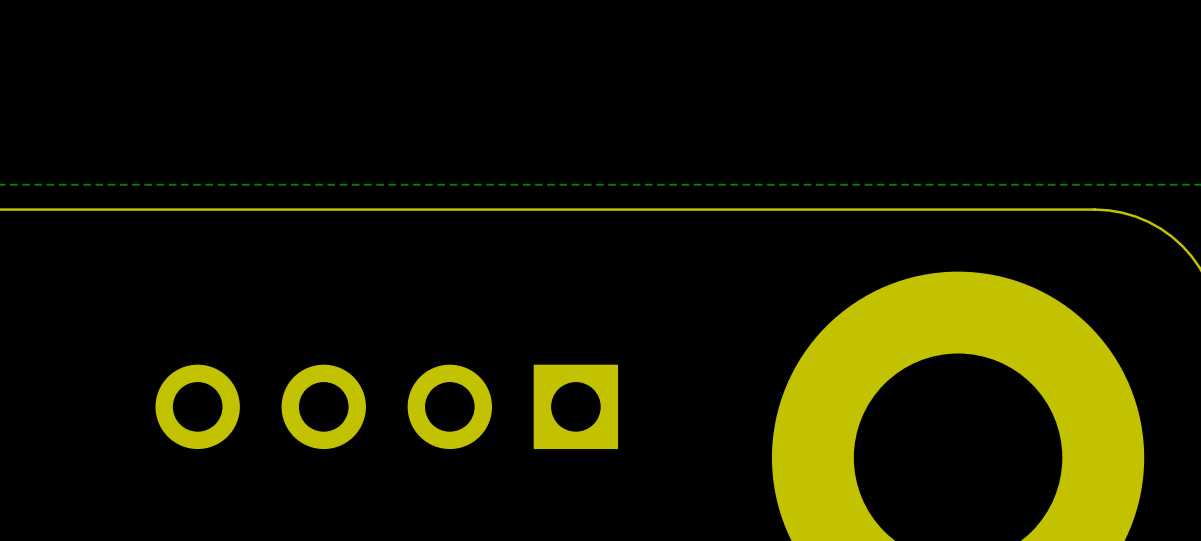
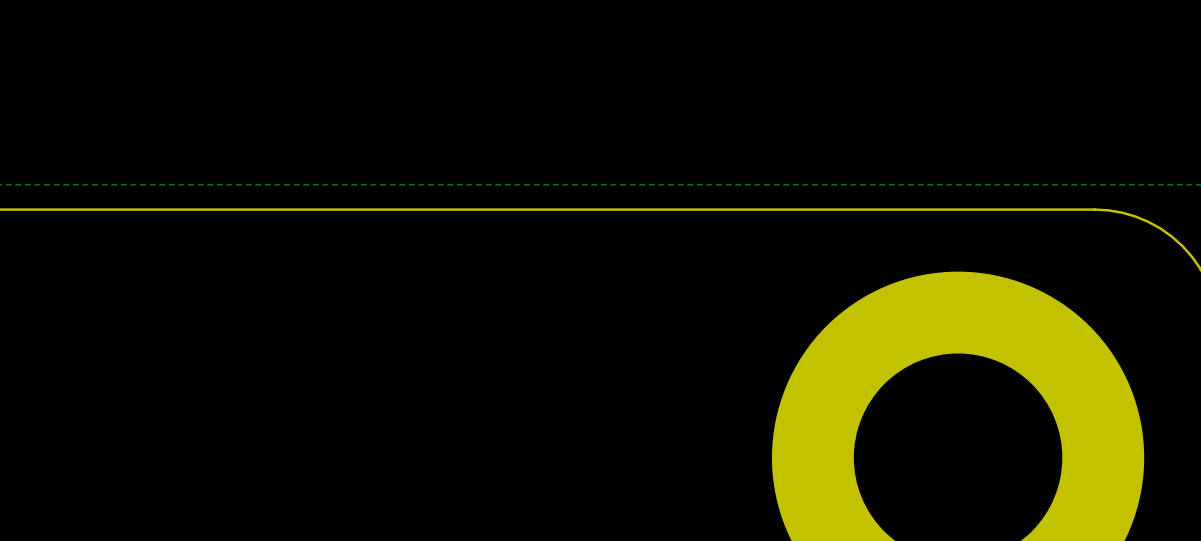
part: (386, 406) -> none

